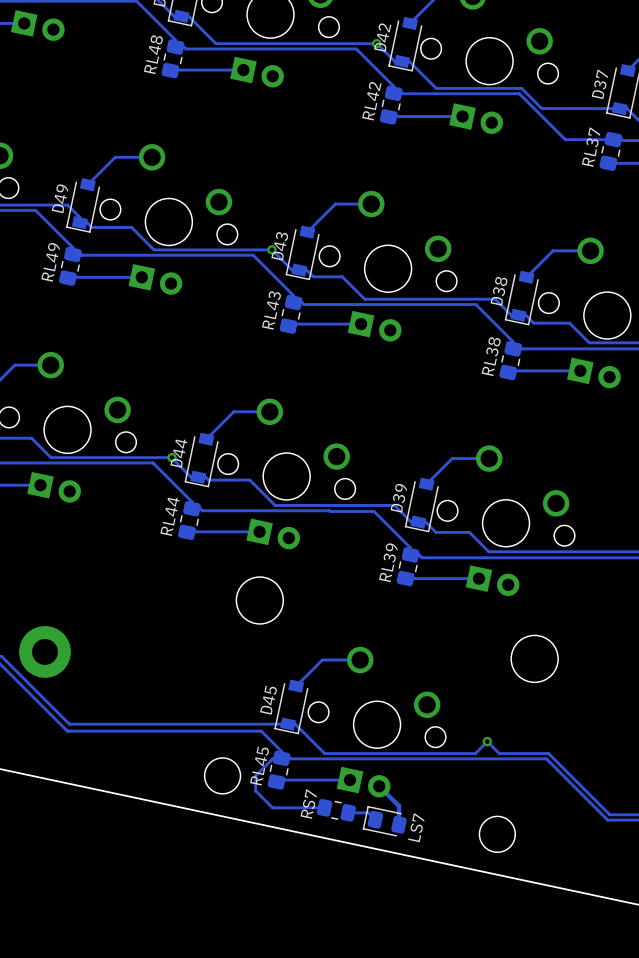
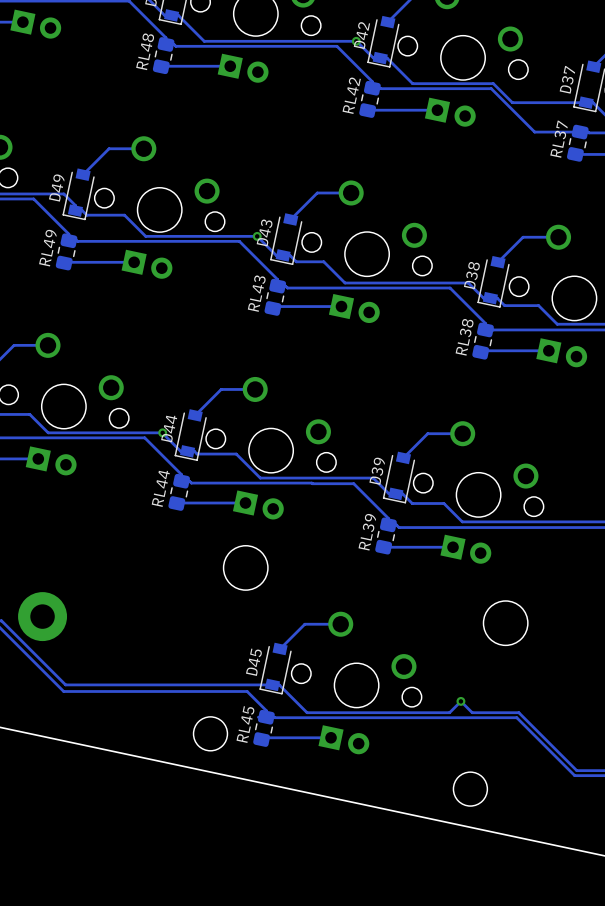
track: (273, 758) (255, 775) (255, 790) (272, 807) (324, 807) -> none
track: (379, 786) (399, 806) (399, 824) -> none
RS7: (336, 810) -> none
track: (348, 812) (368, 812) (375, 819) -> none
LS7: (384, 821) -> none

